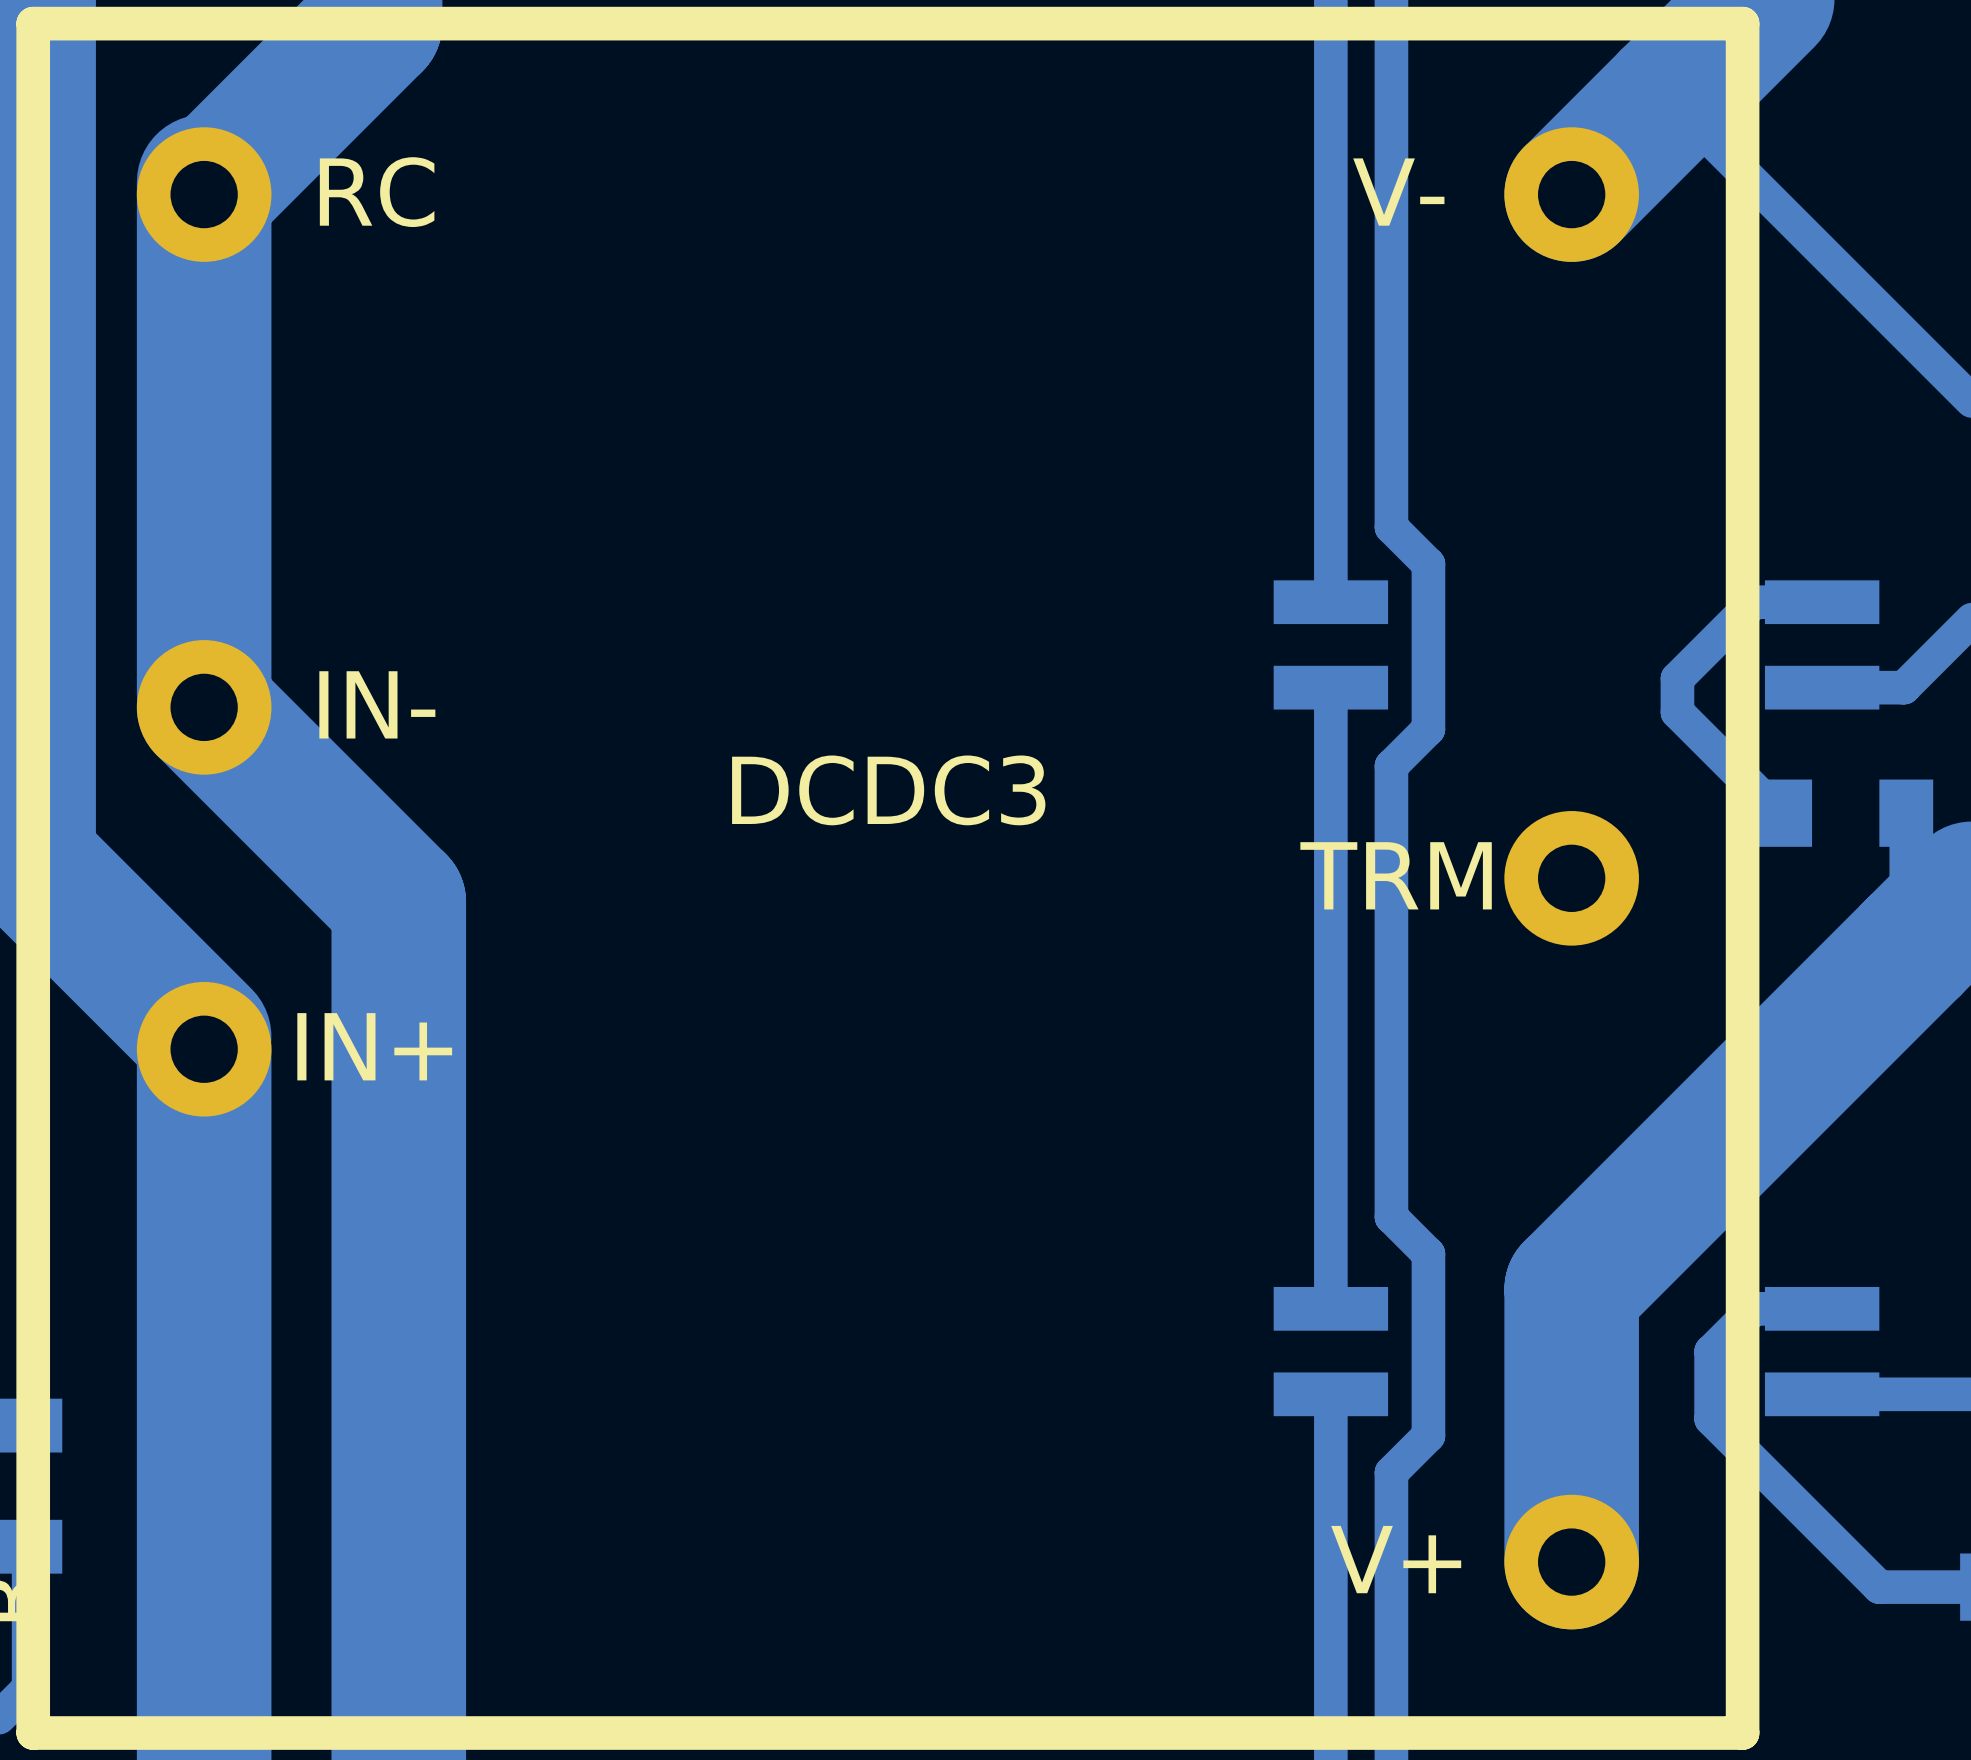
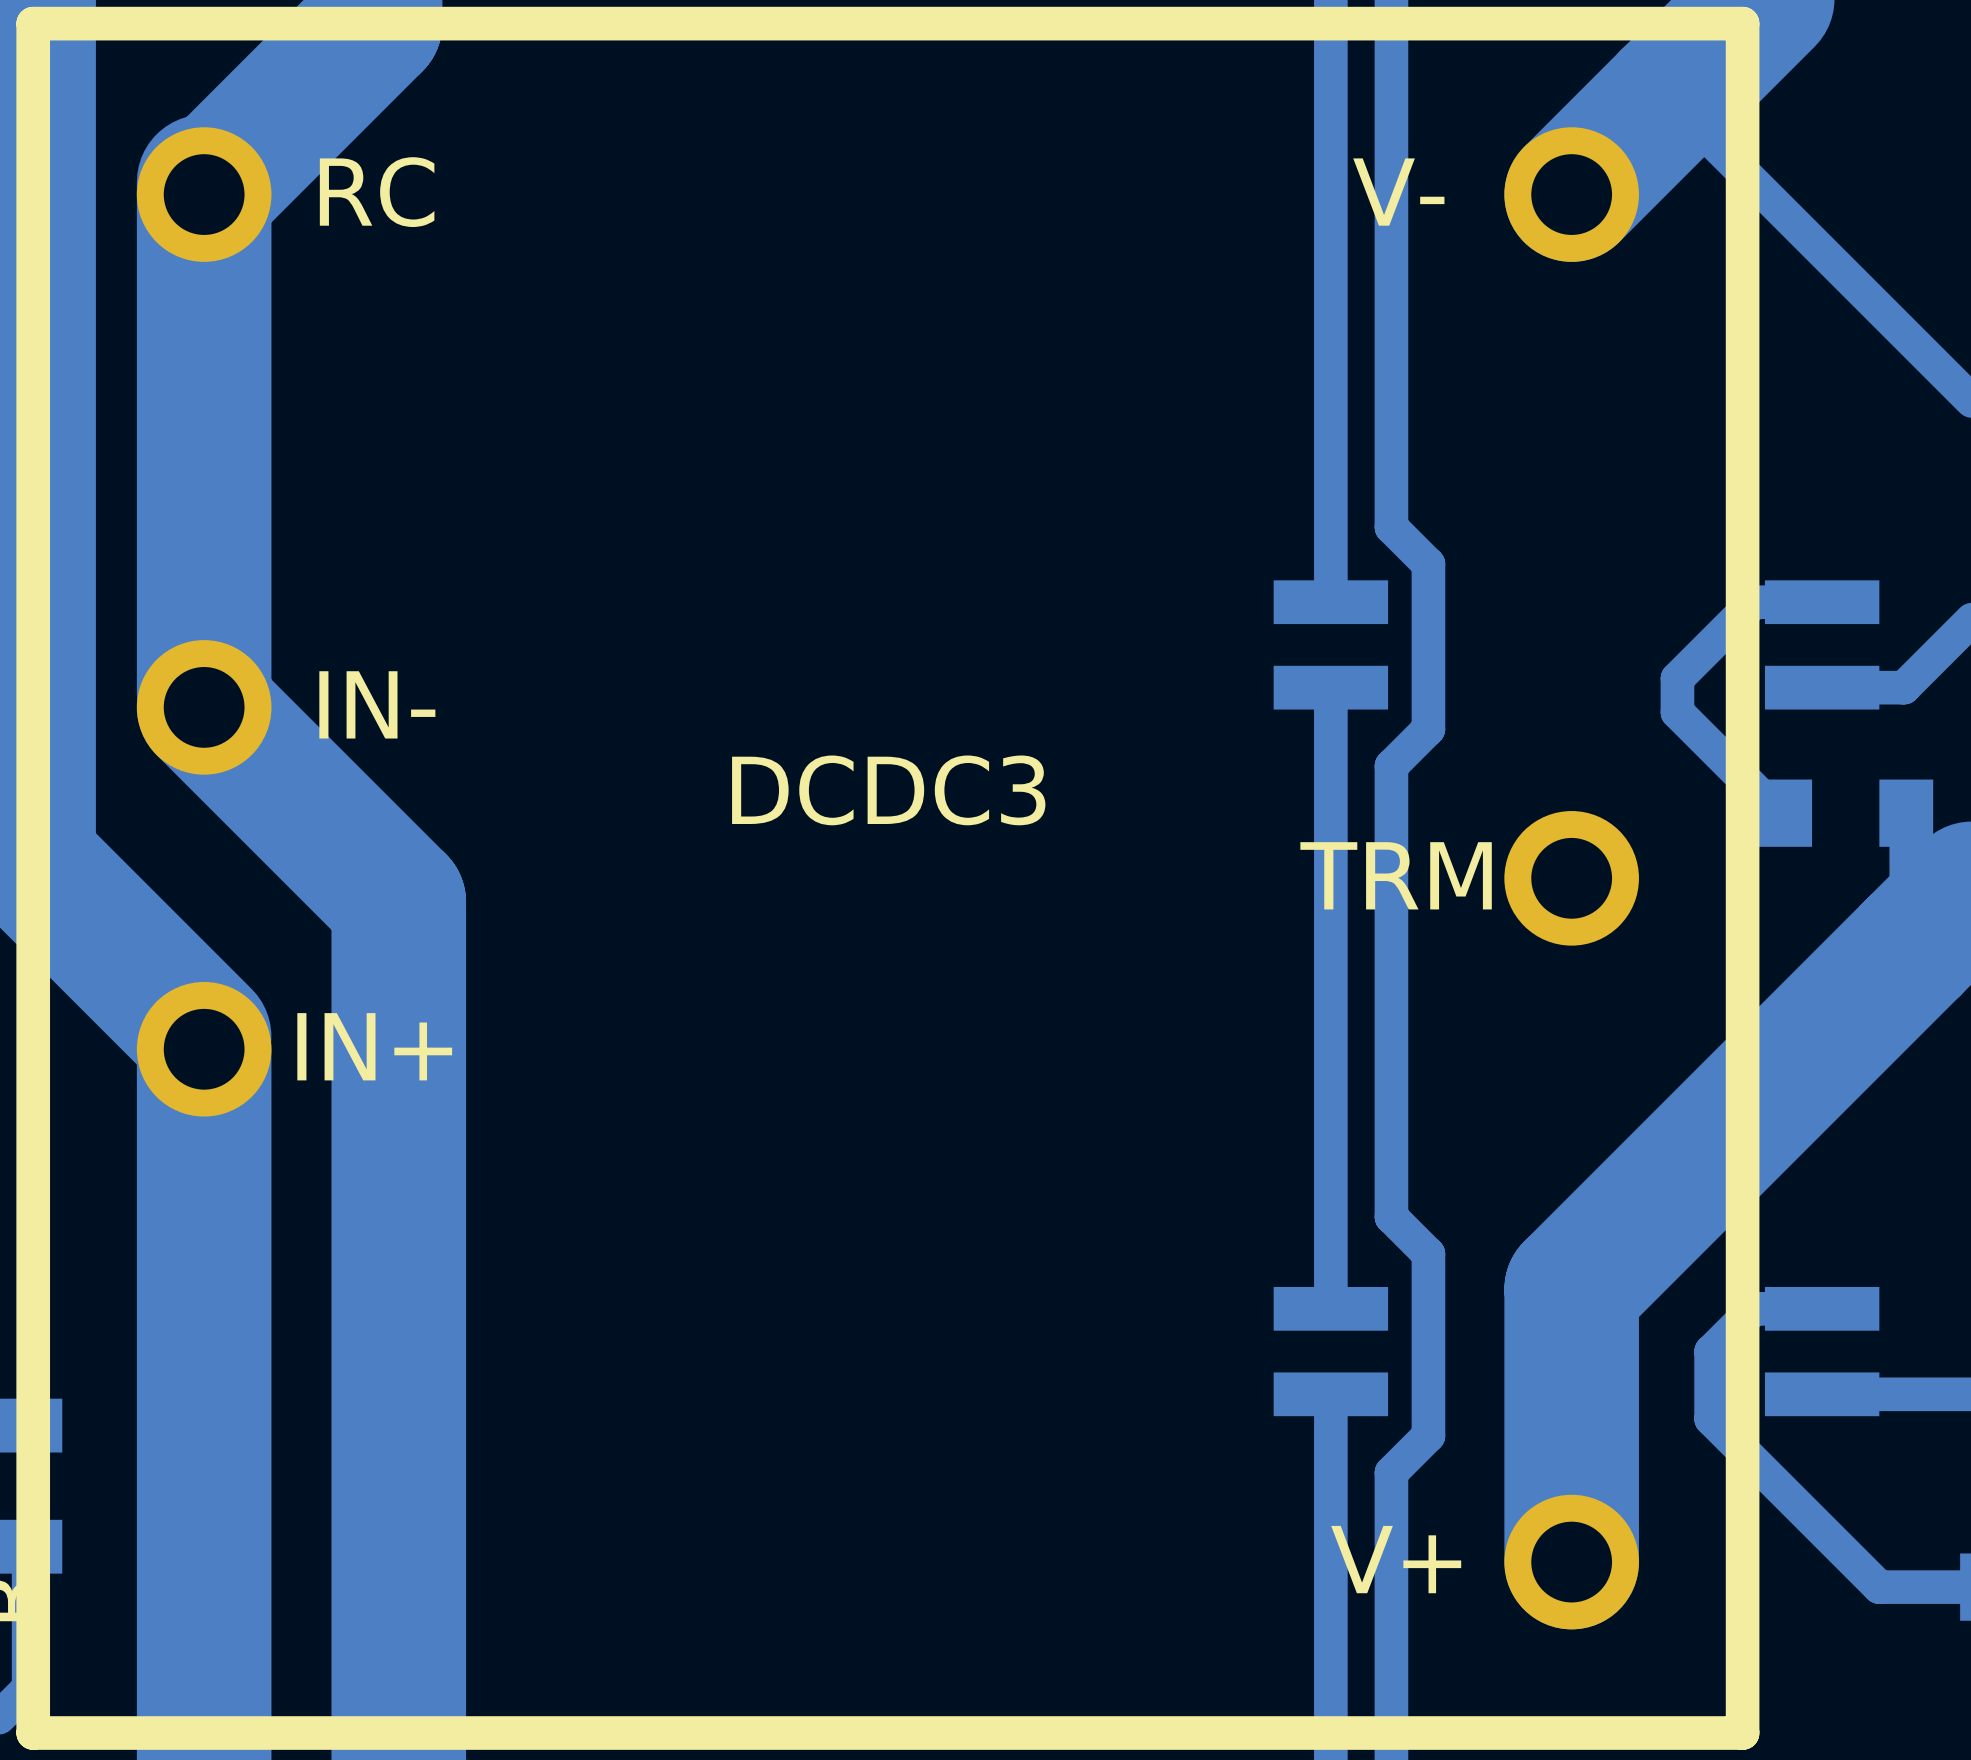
DCDC3 footprint: [16, 6, 1760, 1750] -> [16, 6, 1760, 1750]

